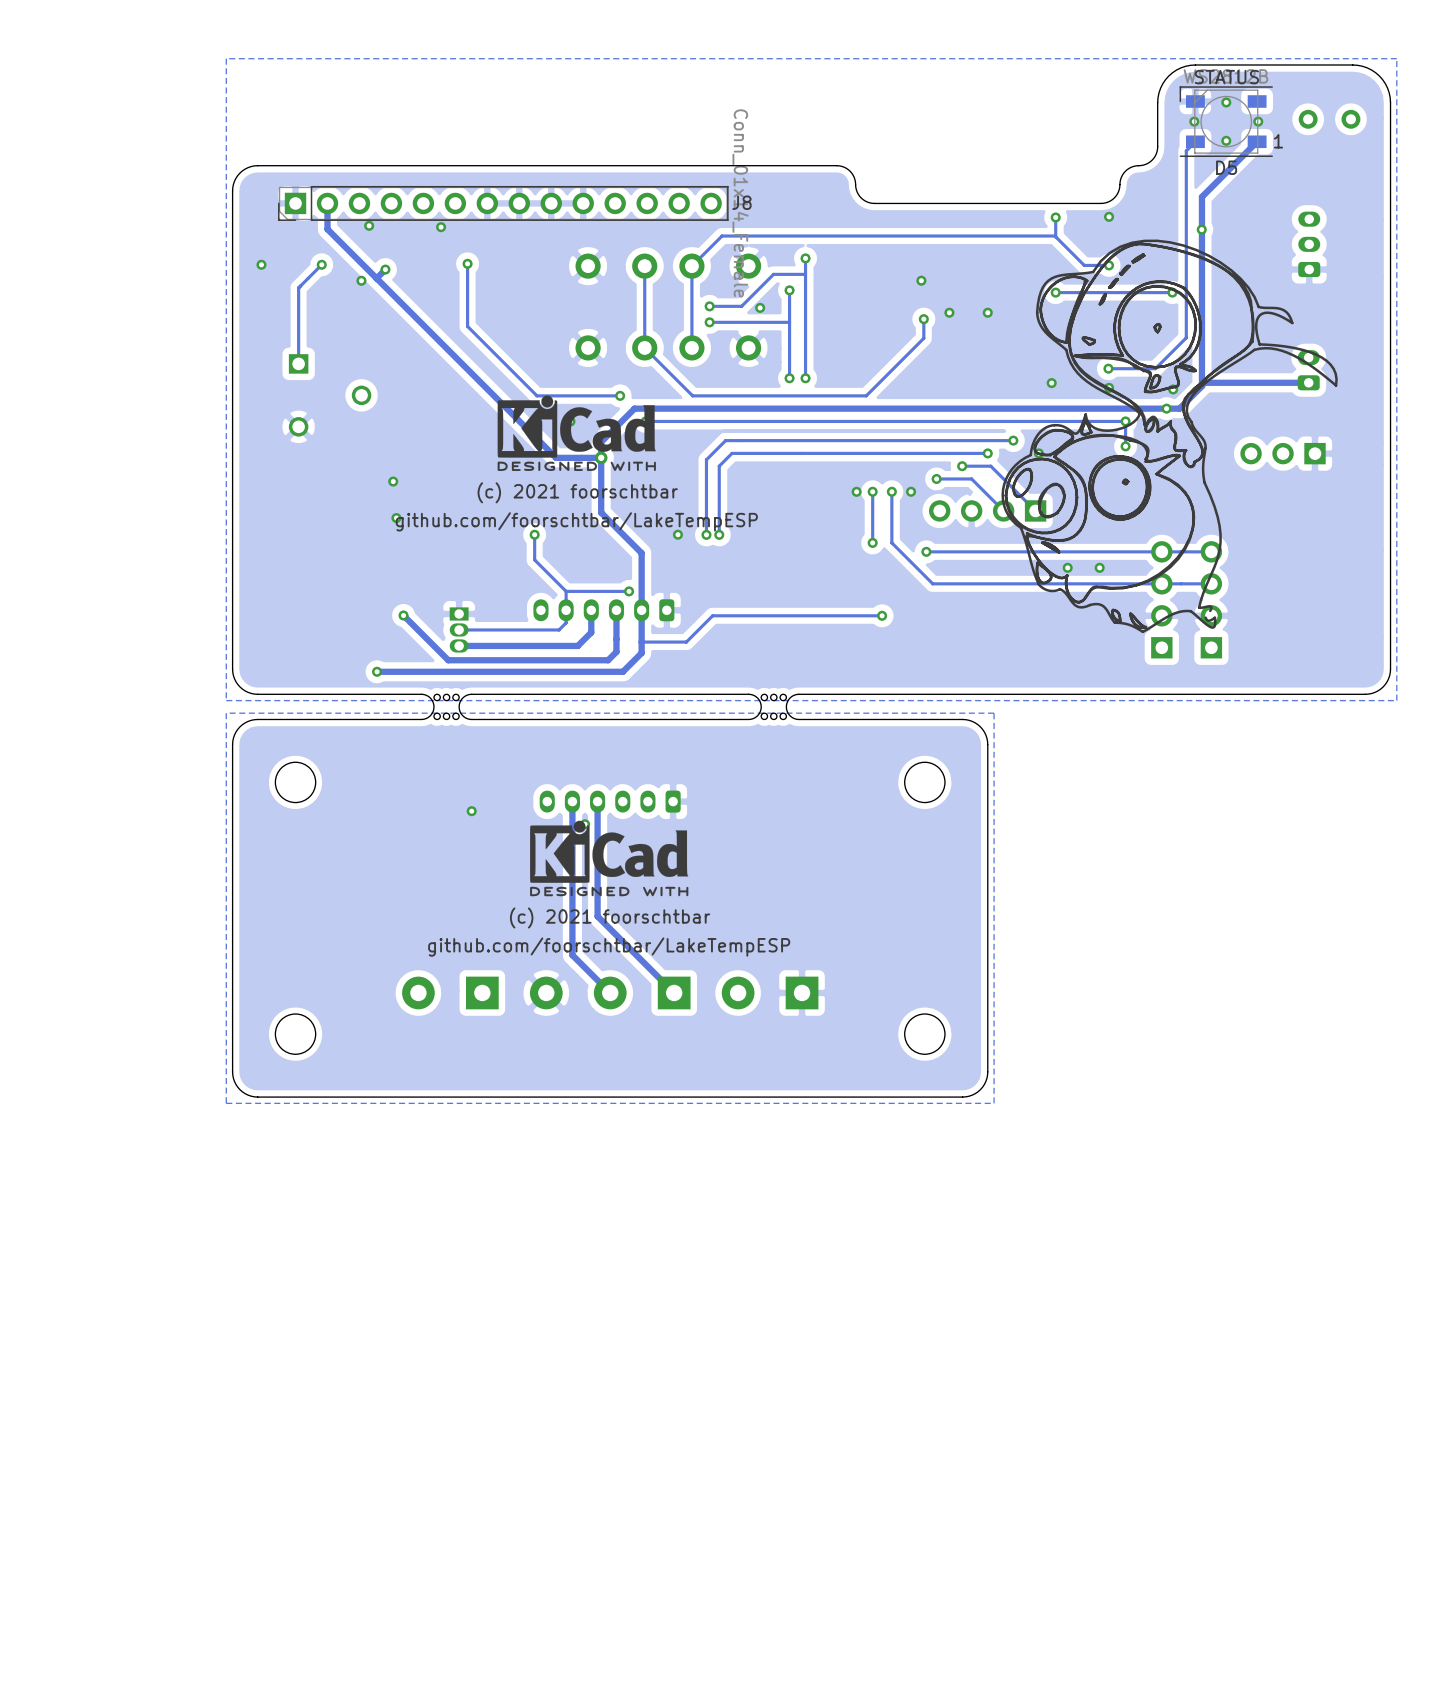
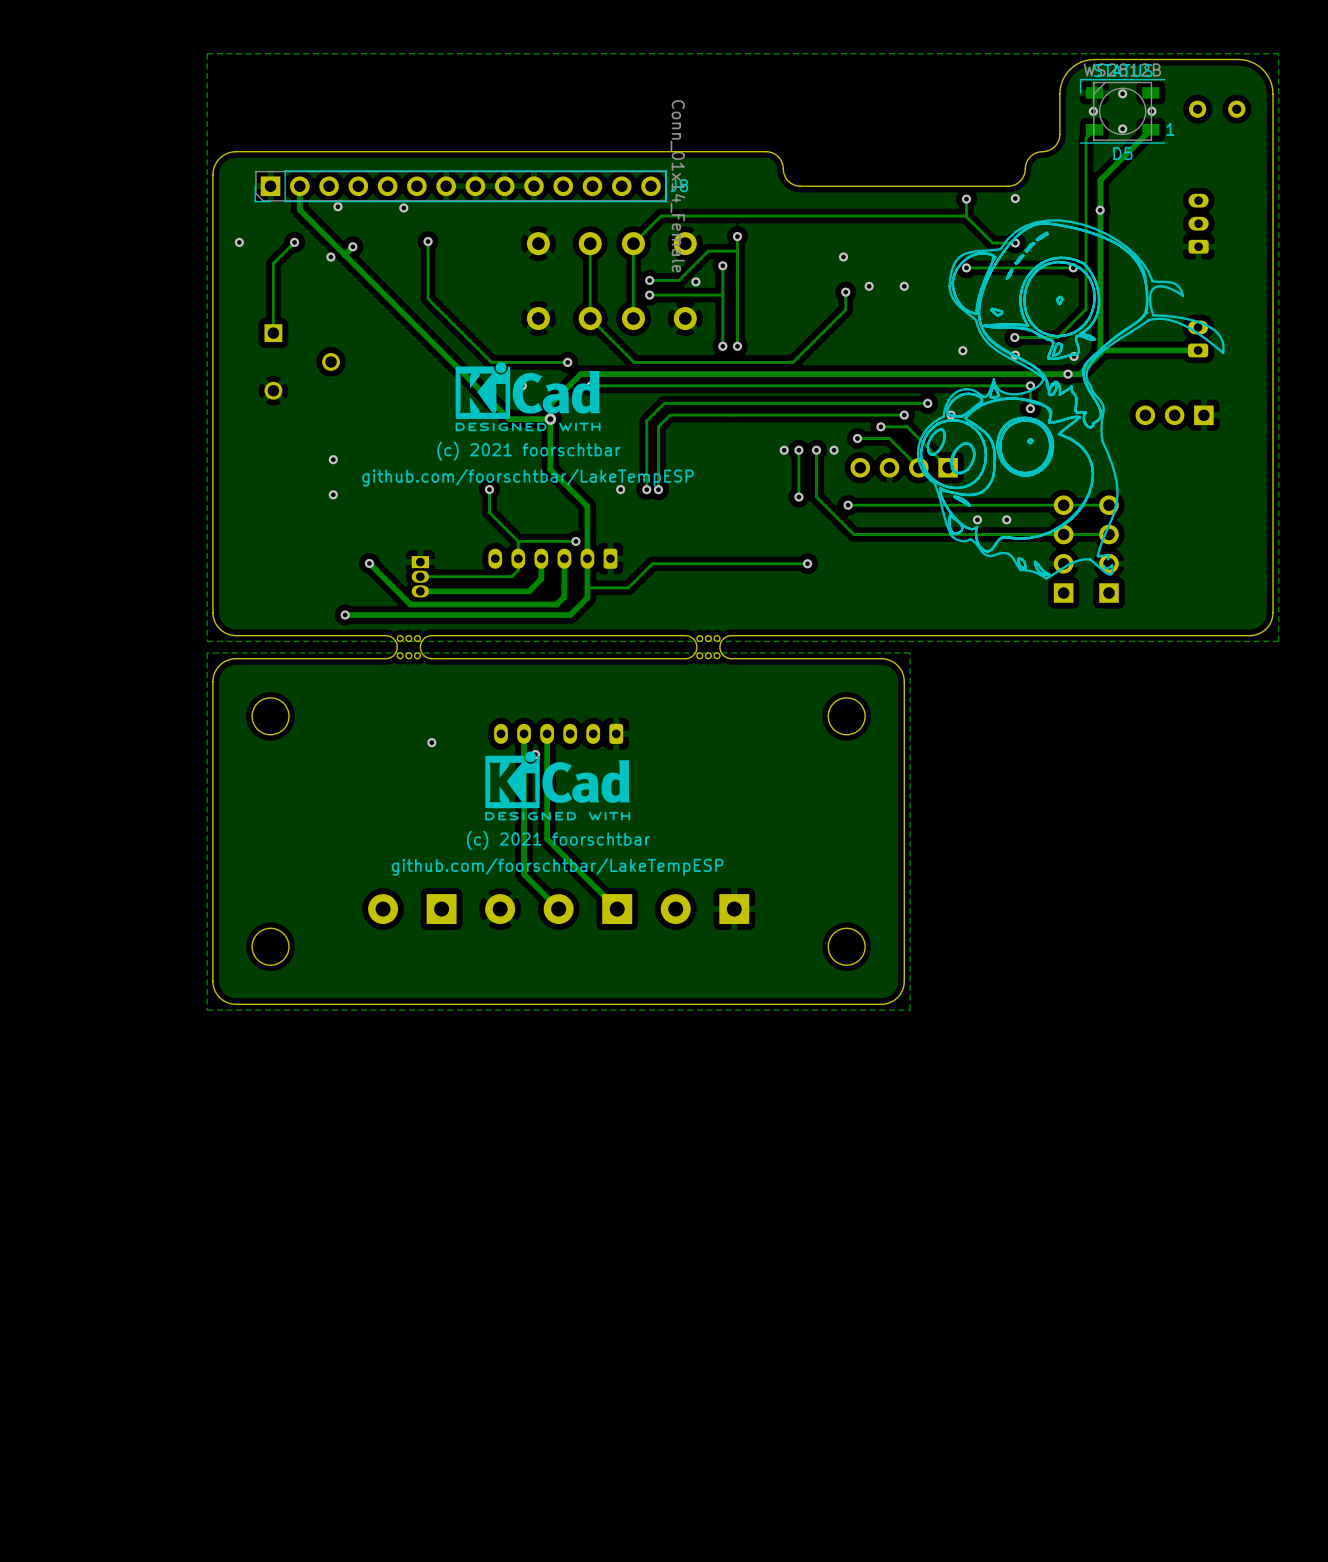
via: (393, 481) -> none
via: none -> (333, 459)
via: (396, 518) -> none
via: none -> (333, 494)

